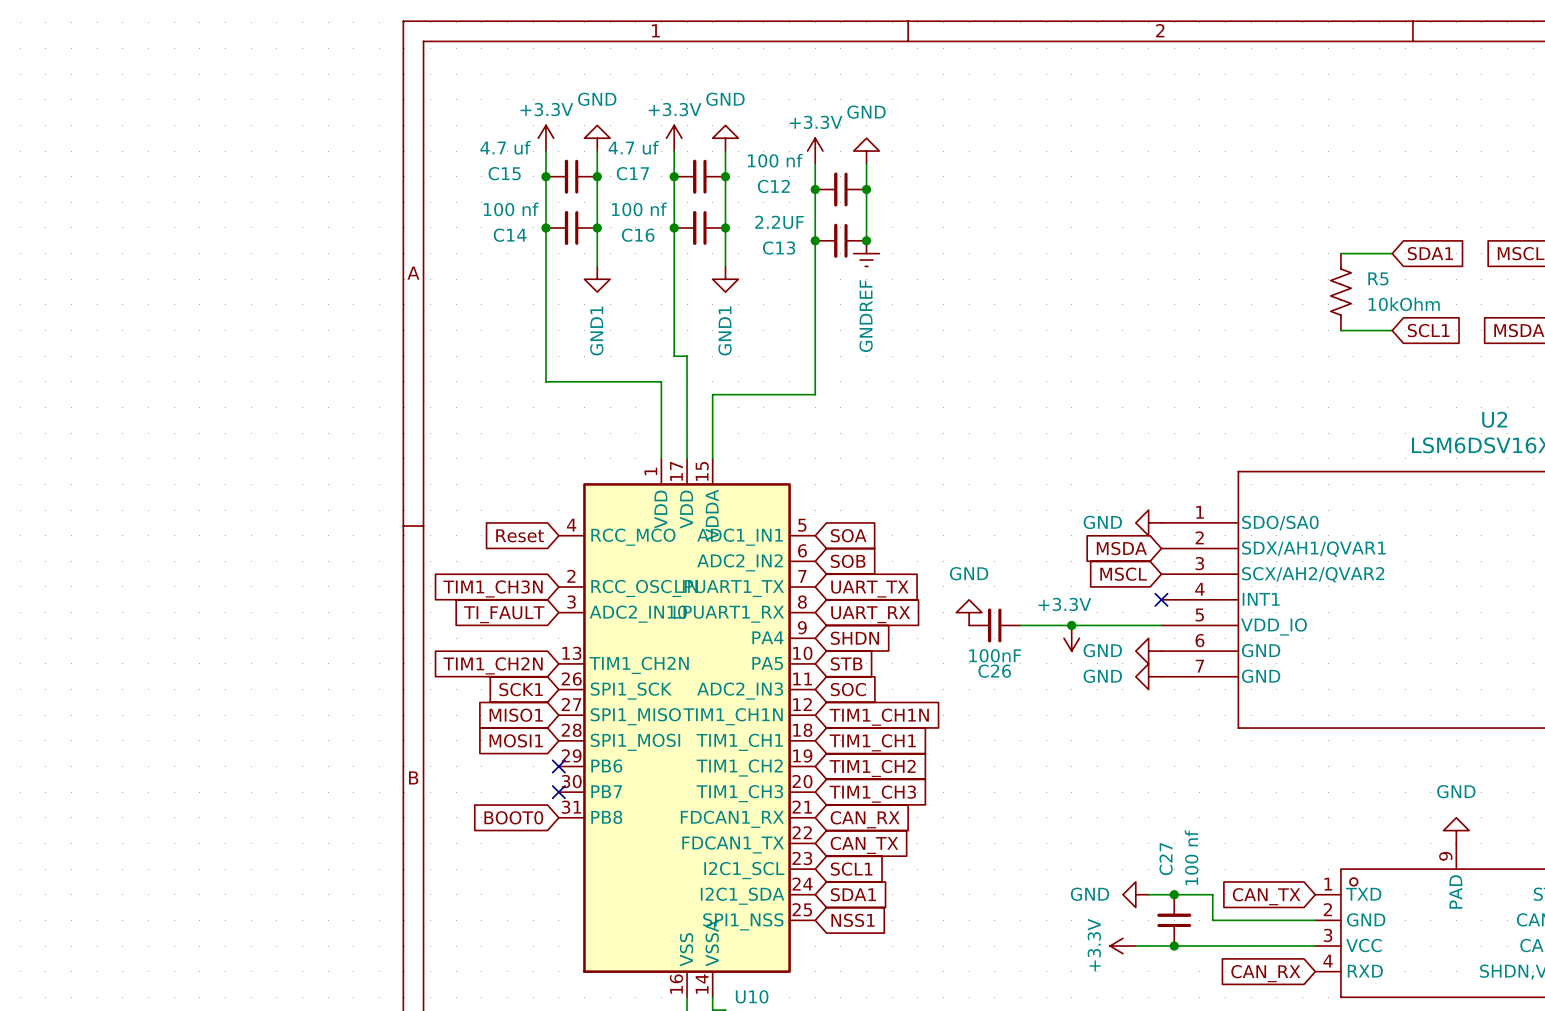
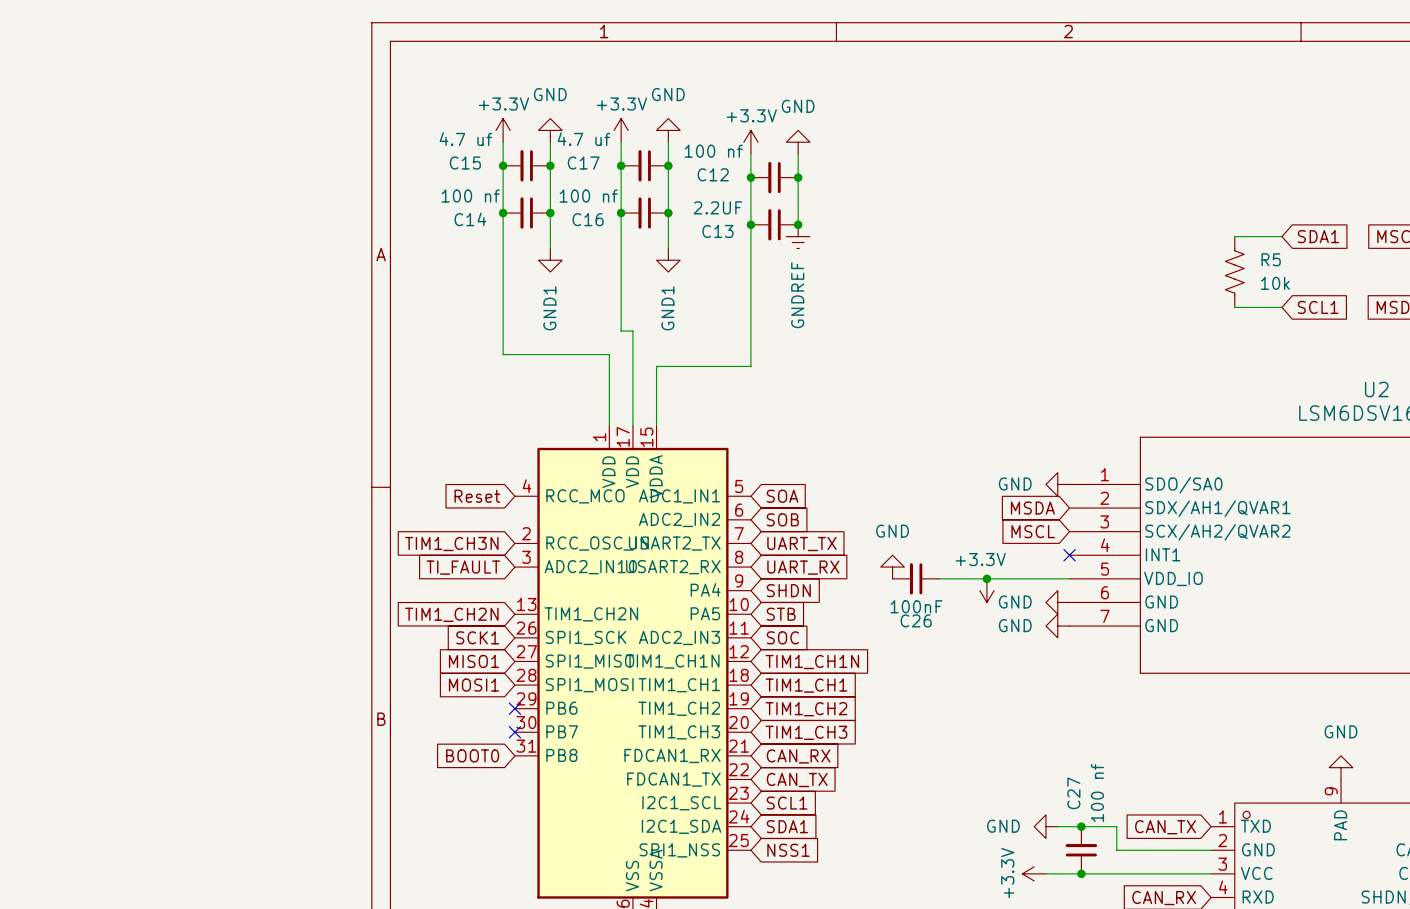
R5 value: 10kOhm (1404, 304) -> 10k (1275, 283)
U10 pin name: LPUART1_TX (729, 588) -> USART2_TX (674, 543)
U10 pin name: LPUART1_RX (728, 614) -> USART2_RX (673, 567)

